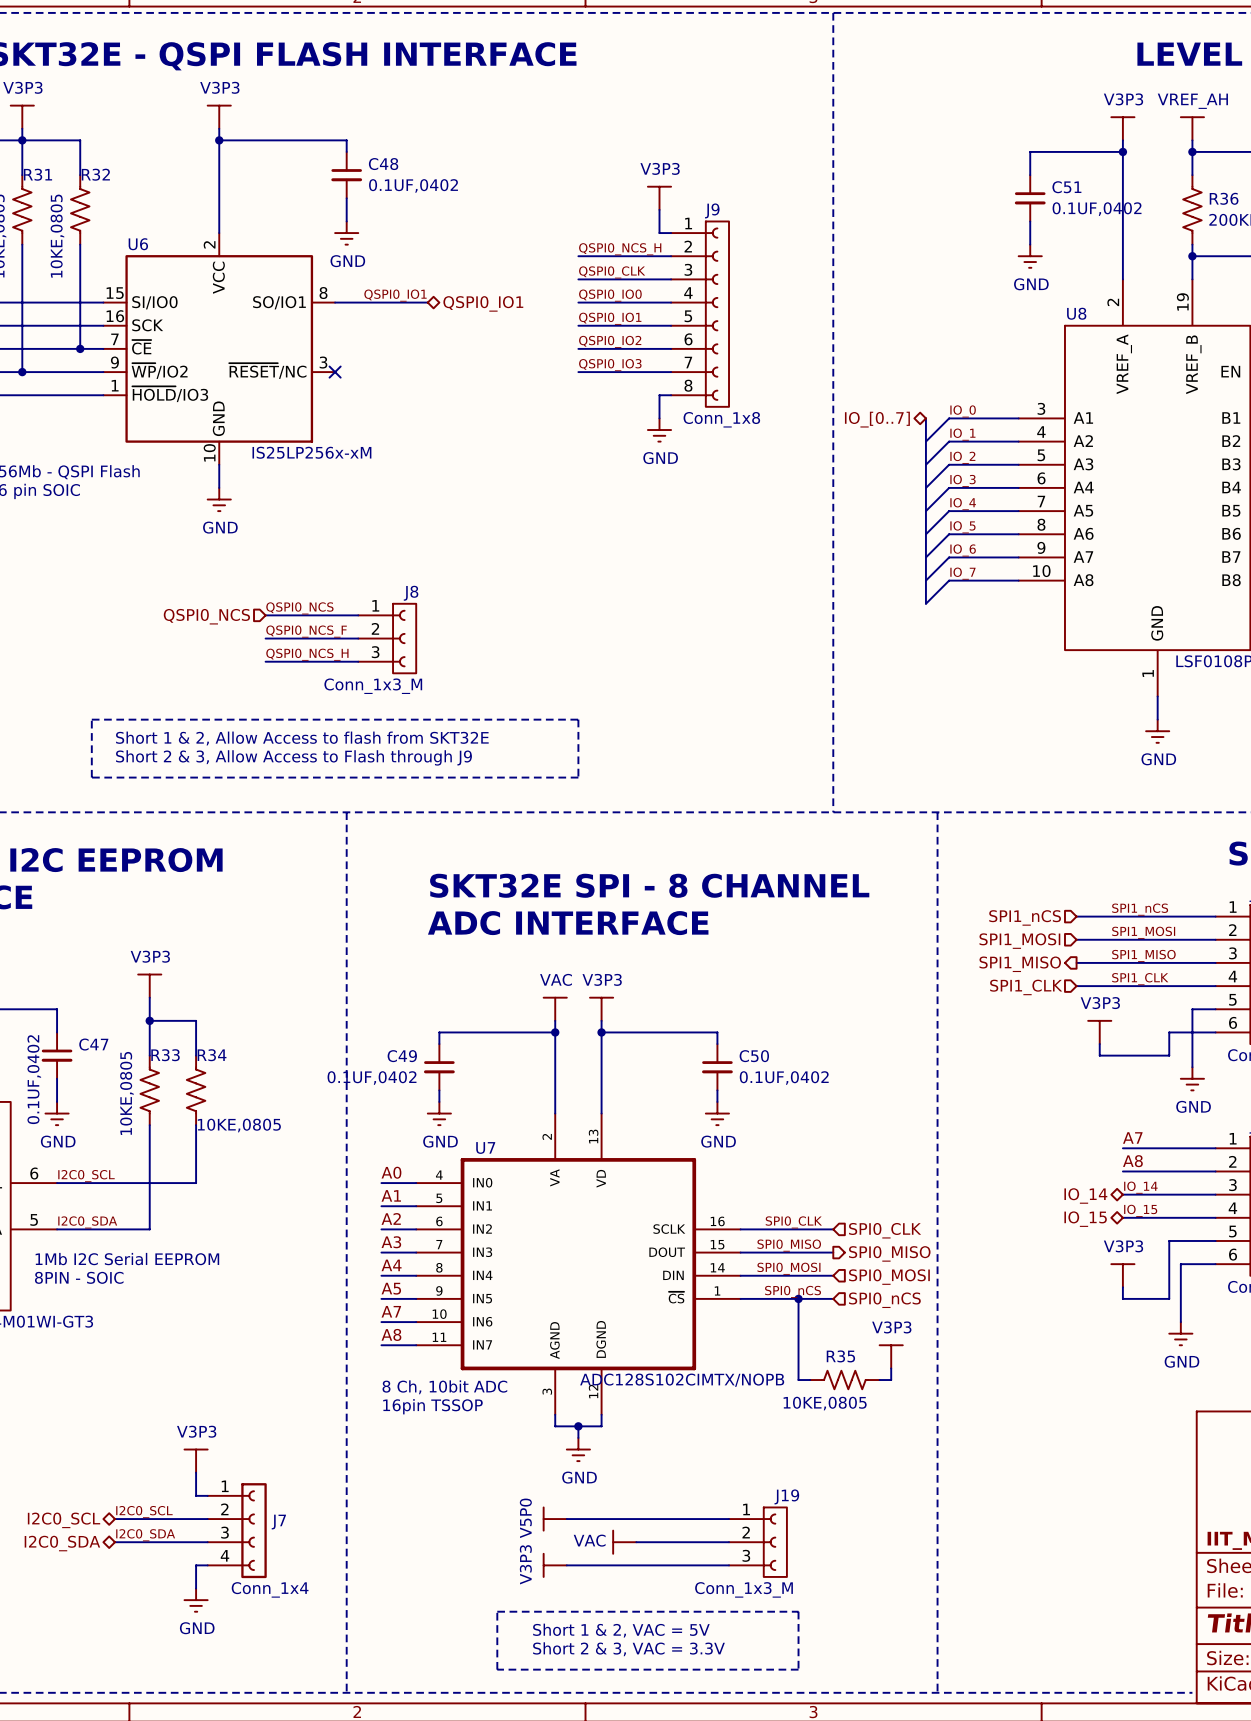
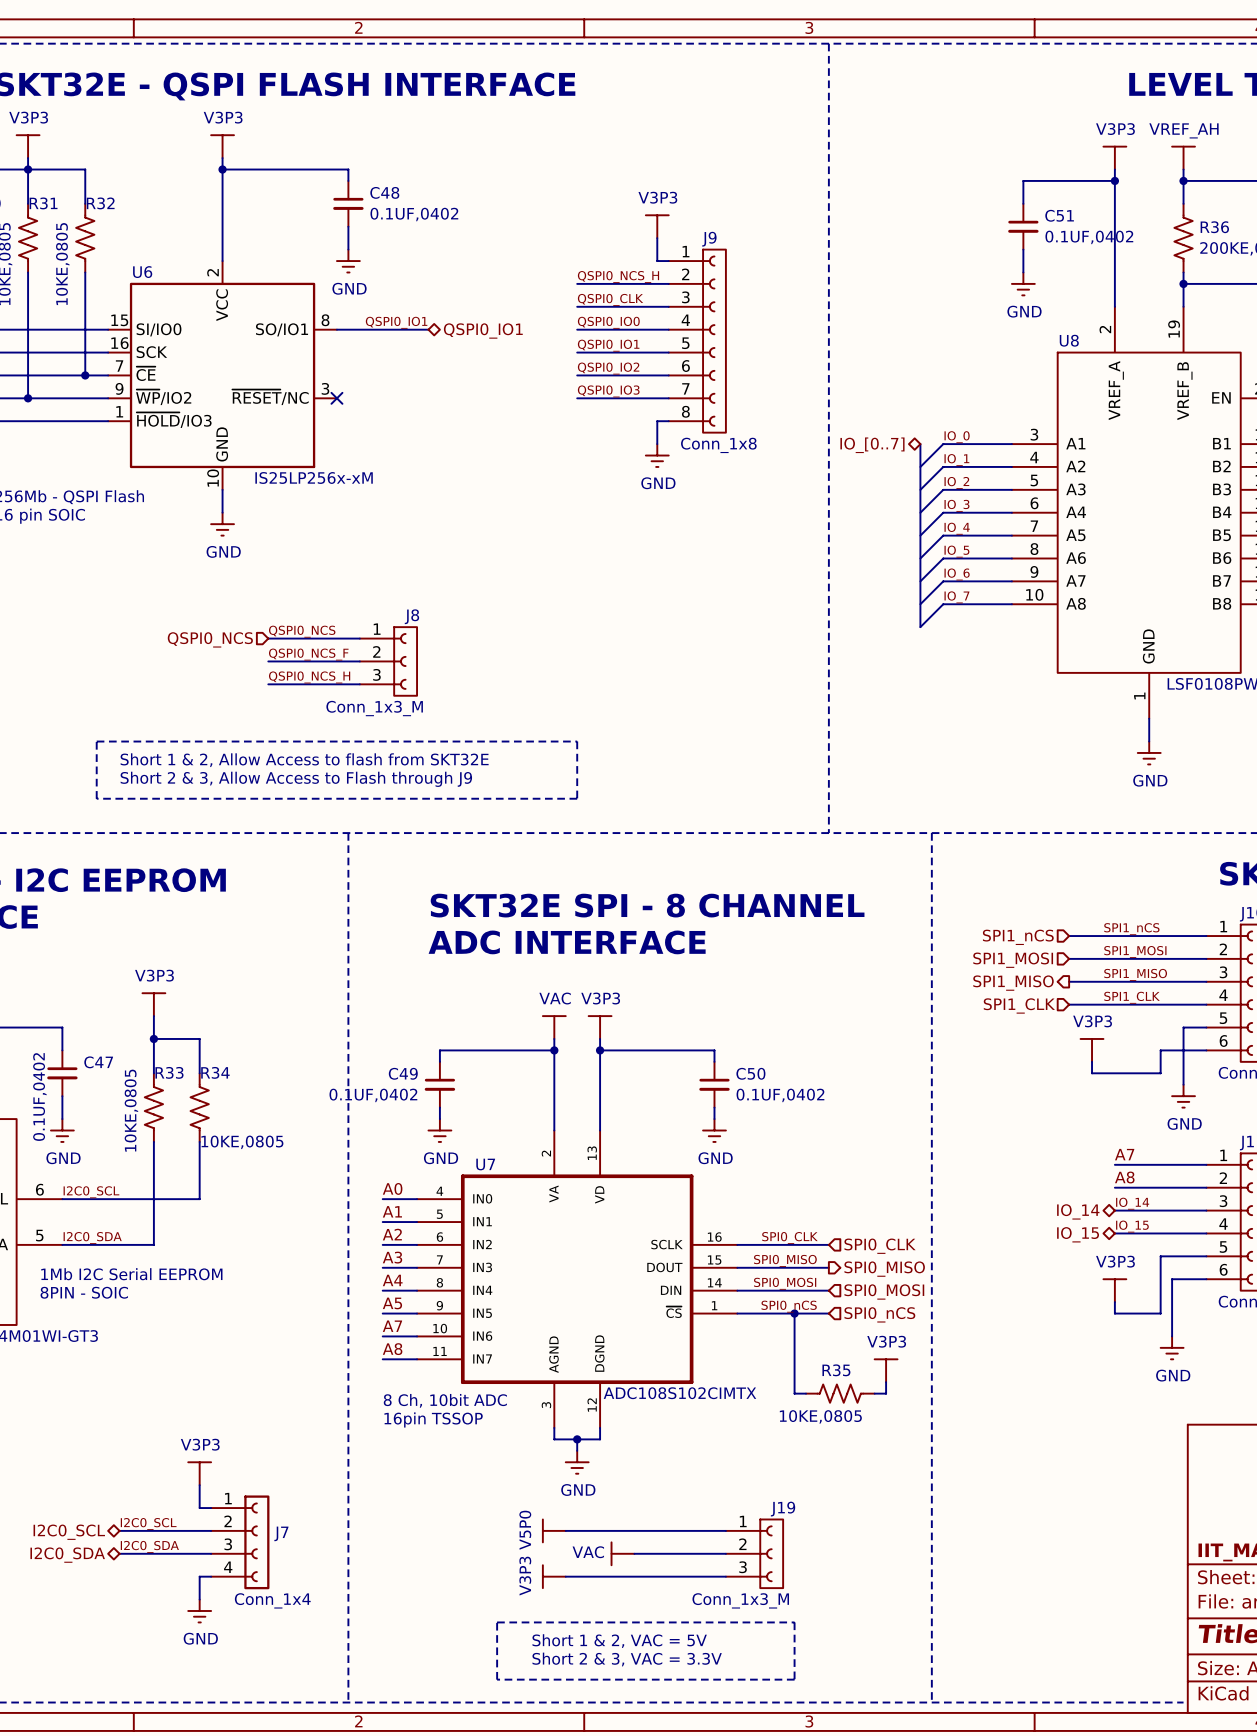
U7 value: ADC128S102CIMTX/NOPB (682, 1380) -> ADC108S102CIMTX (679, 1393)

